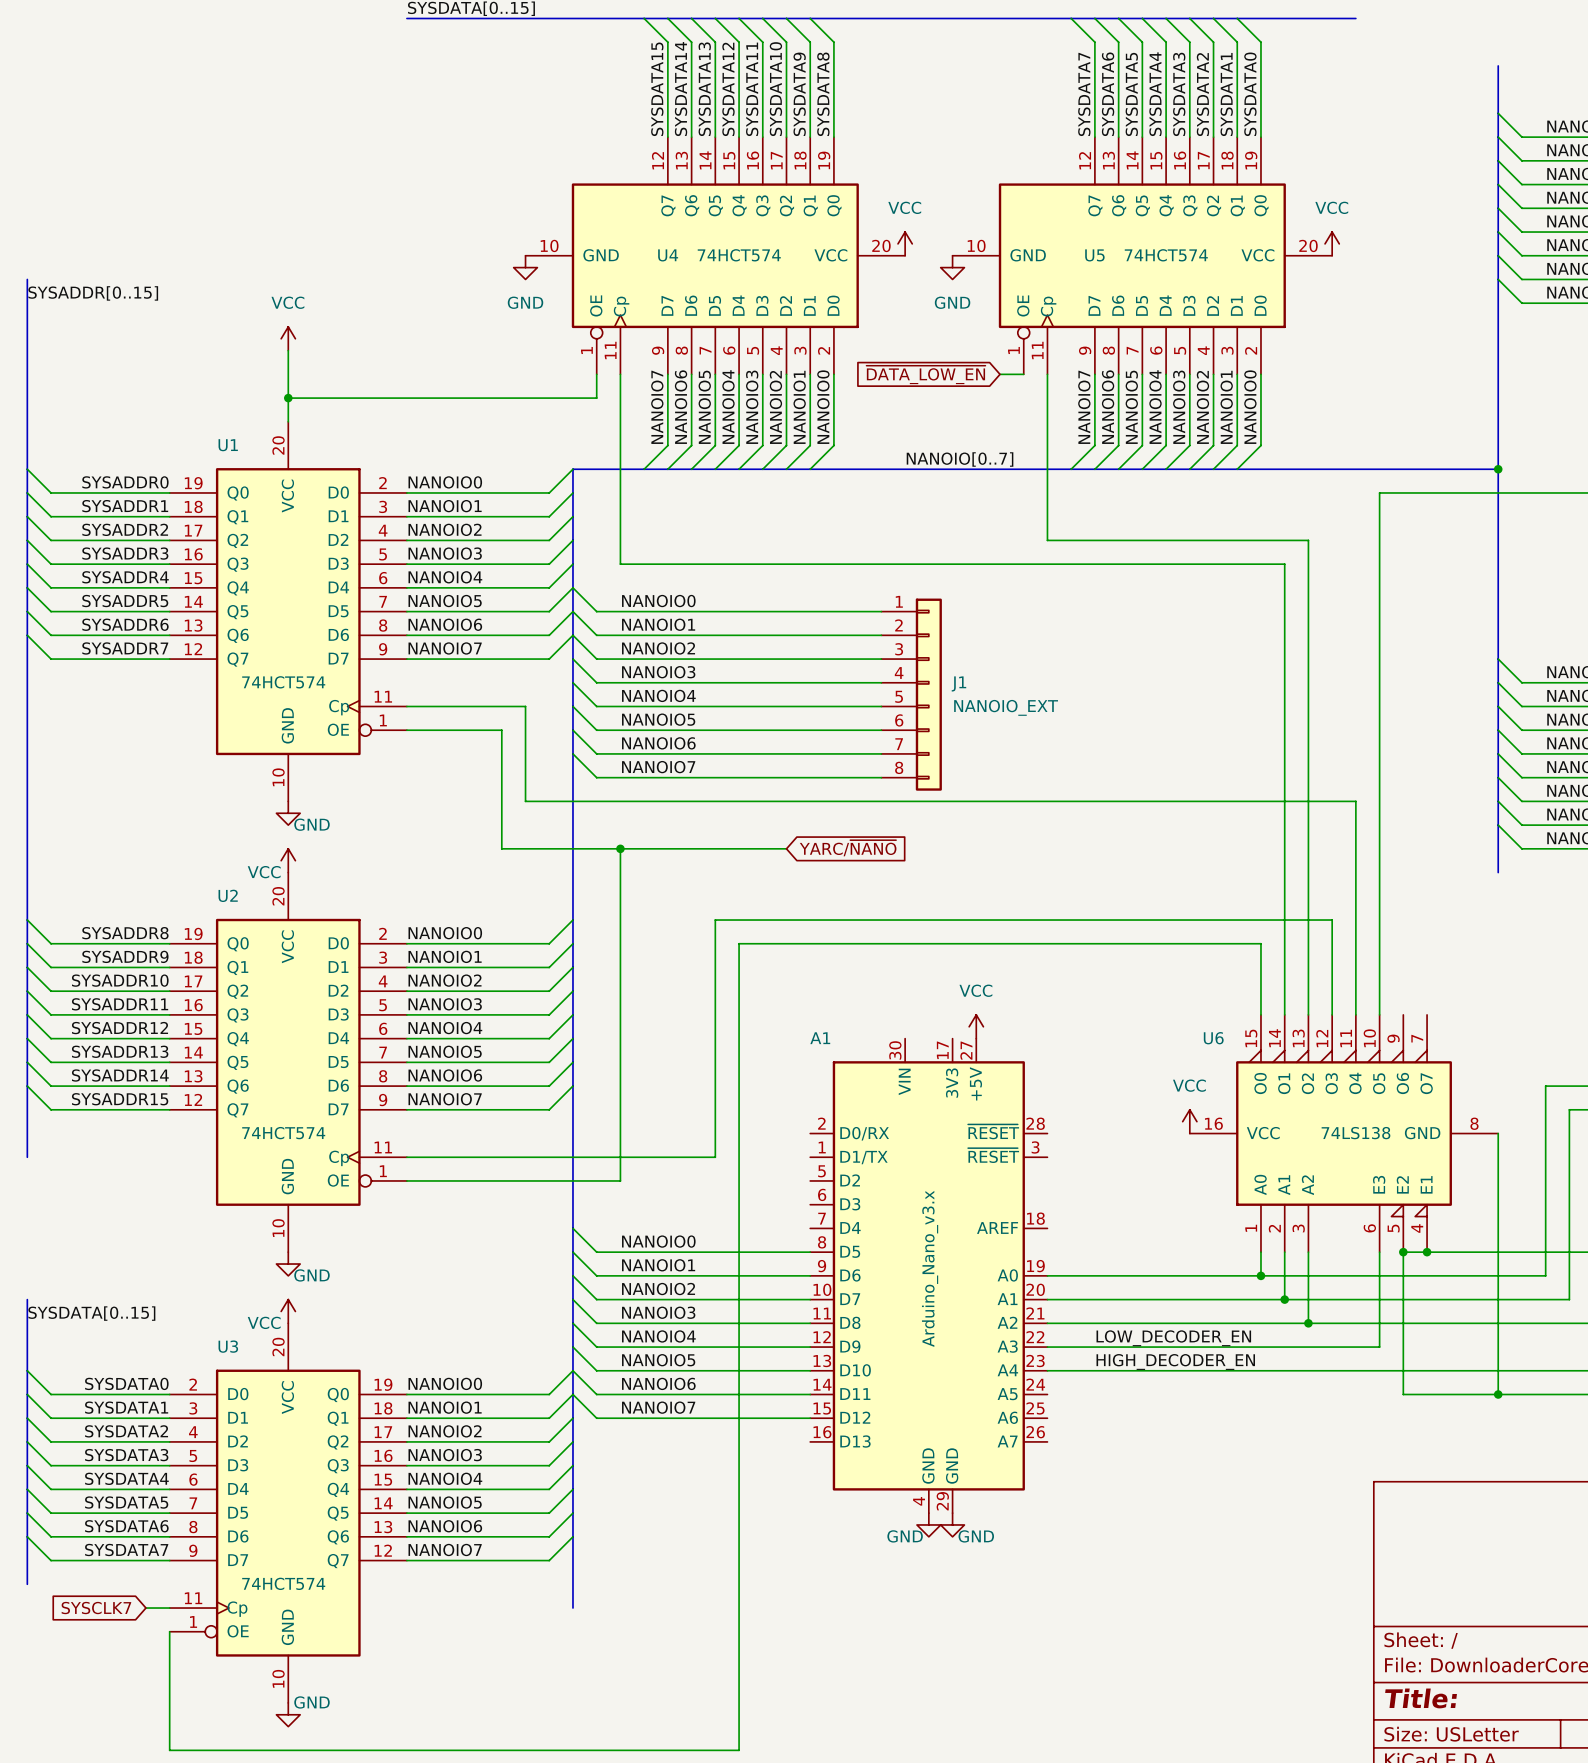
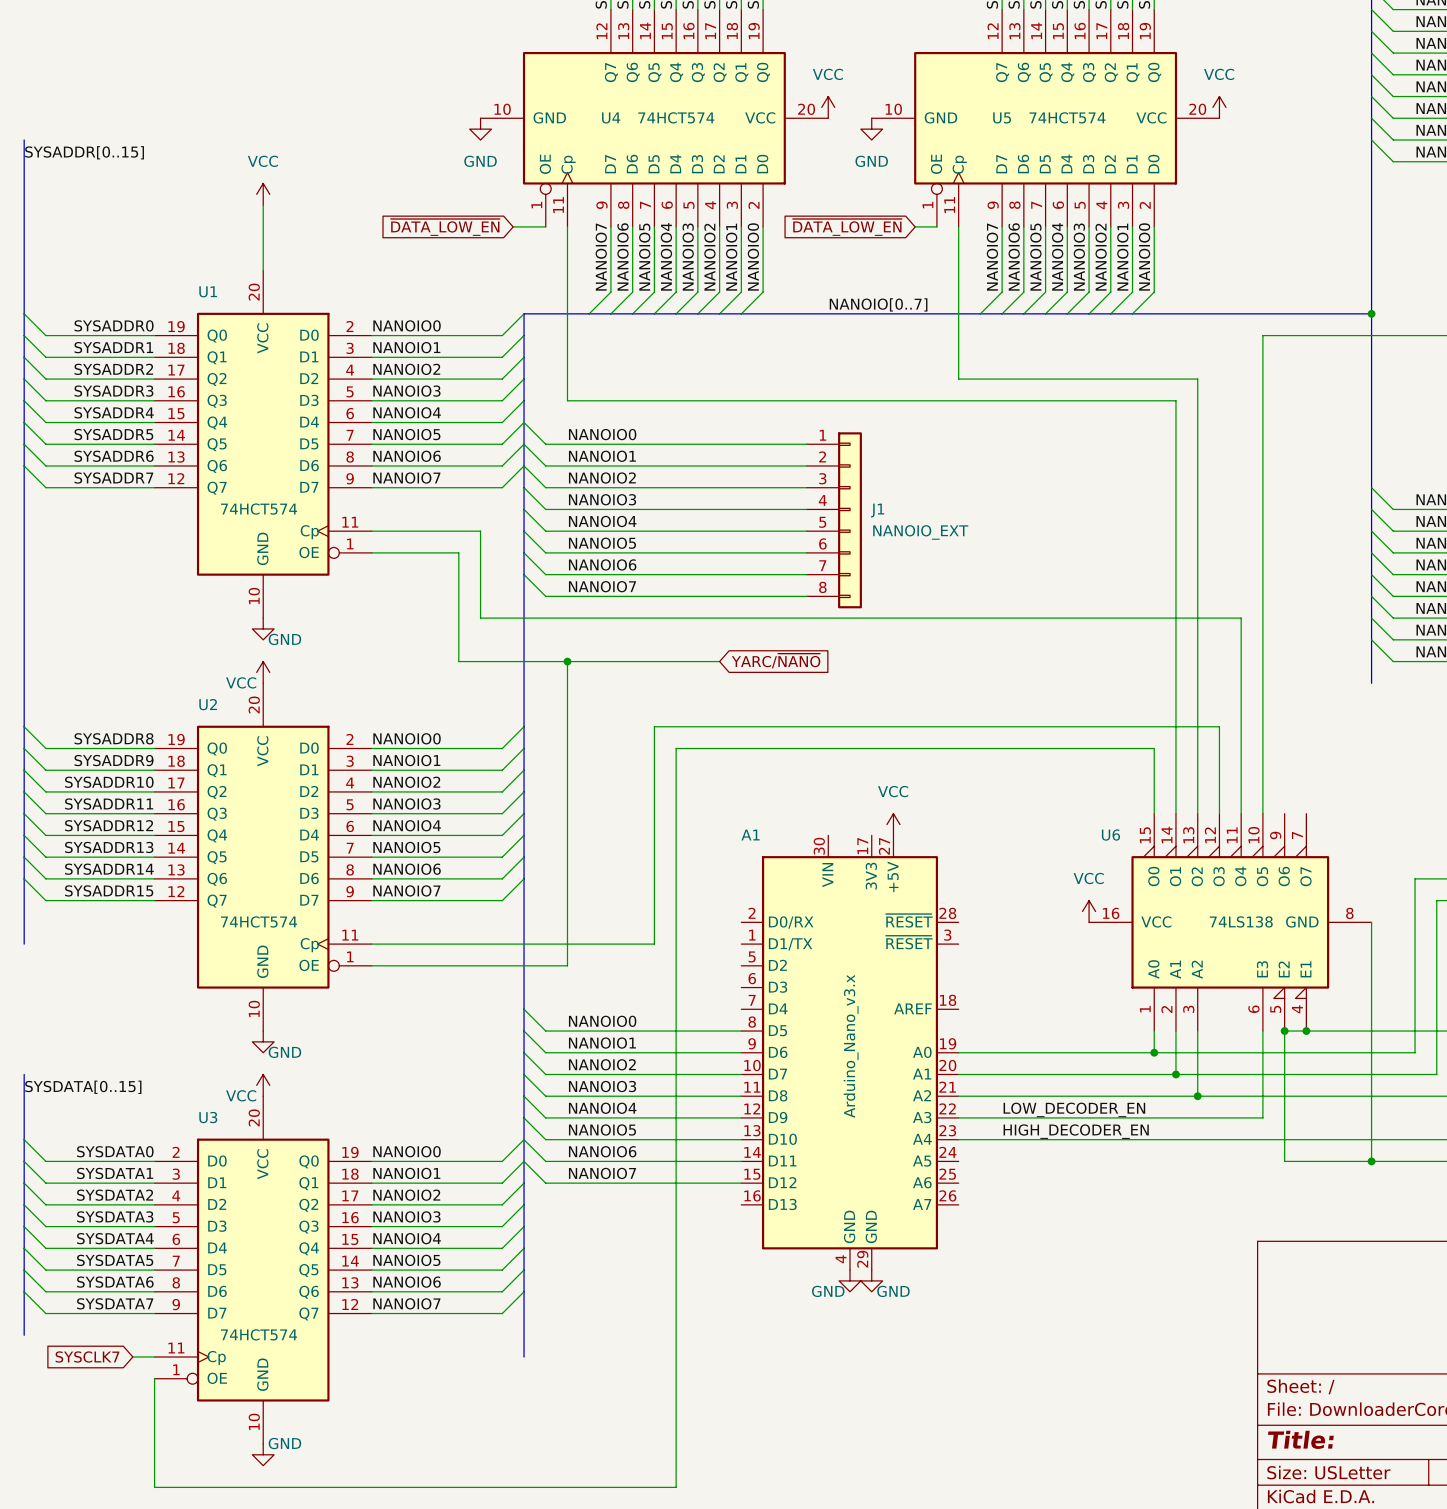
global label: none -> ~{DATA_LOW_EN} (445, 227)
wire: (596, 374) (596, 398) (288, 398) -> (545, 226) (513, 226)
junction: (288, 398) -> none

